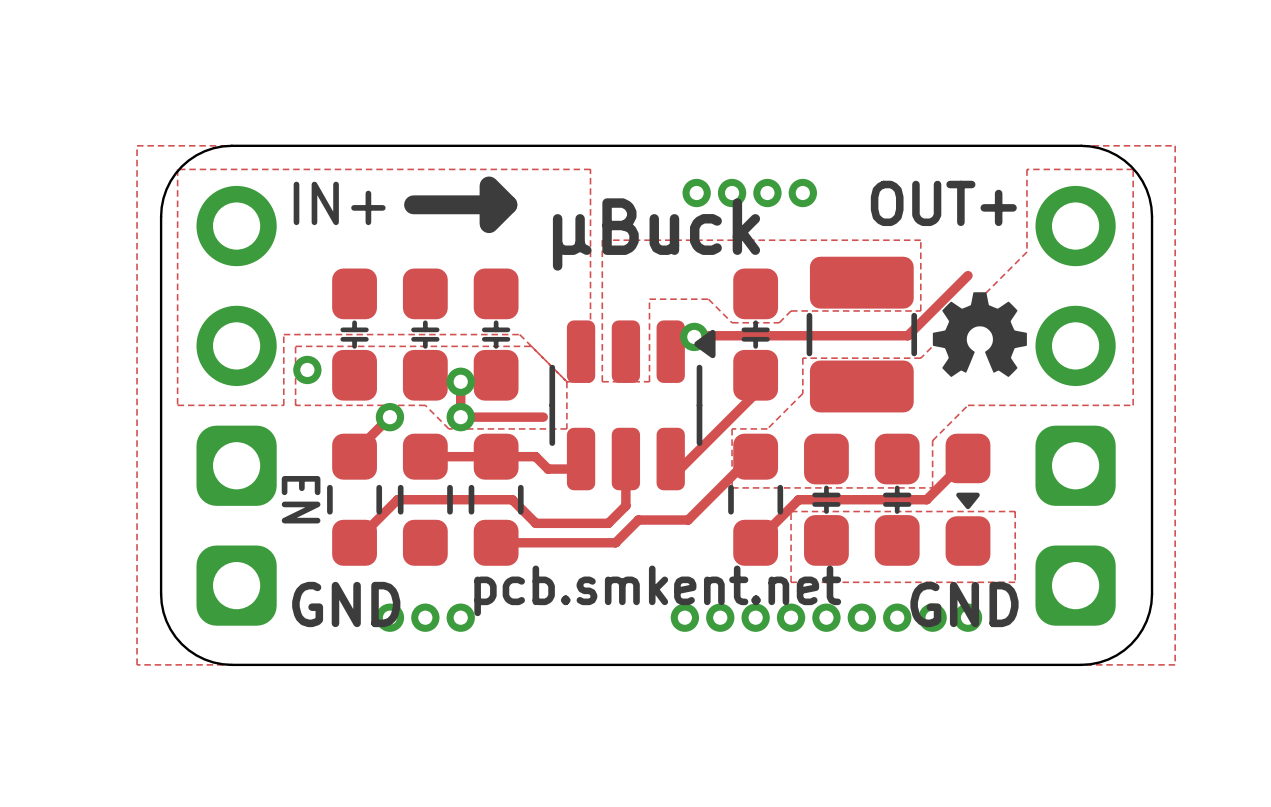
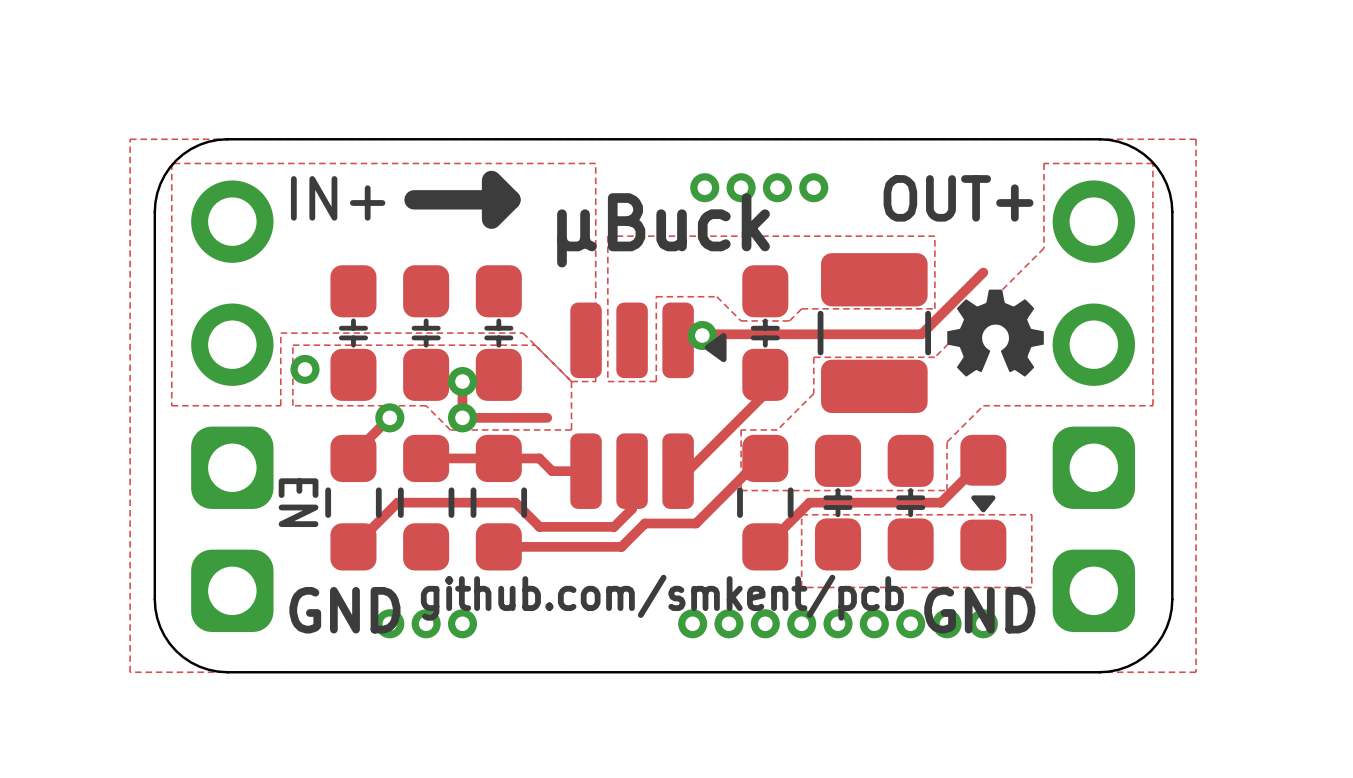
part footprint: [549, 320, 716, 491] -> [570, 302, 727, 509]
text: pcb.smkent.net (657, 590) -> github.com/smkent/pcb (662, 597)

